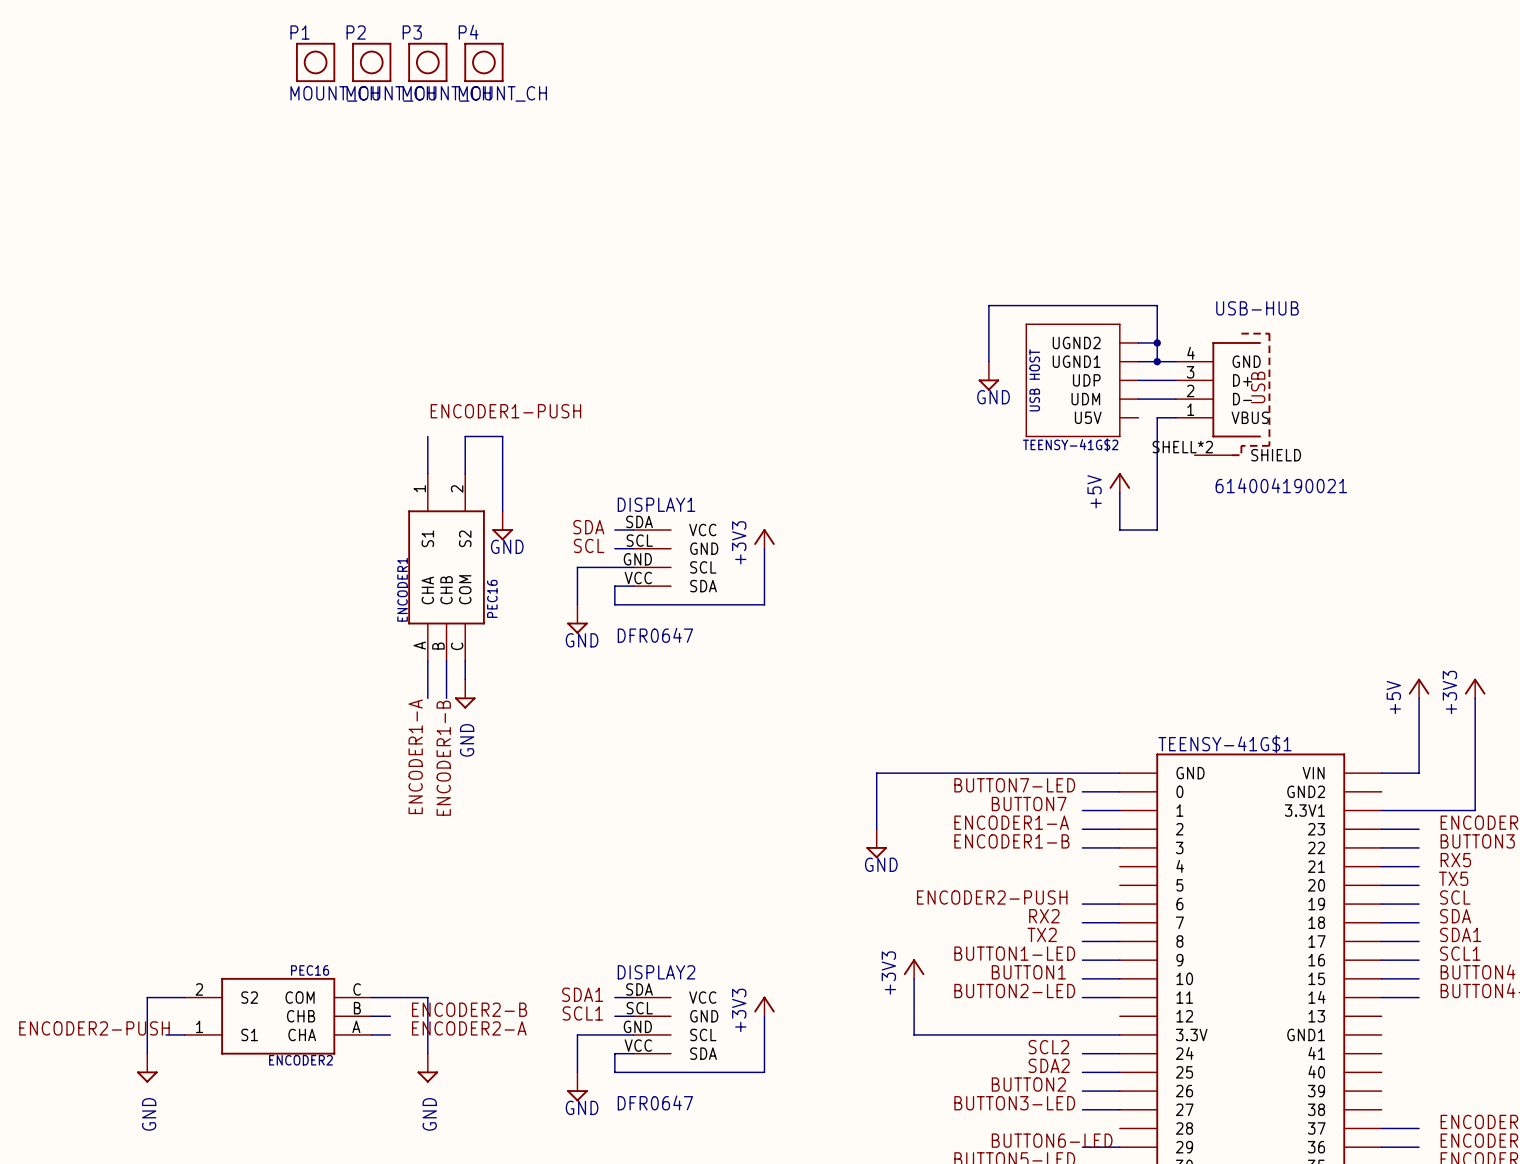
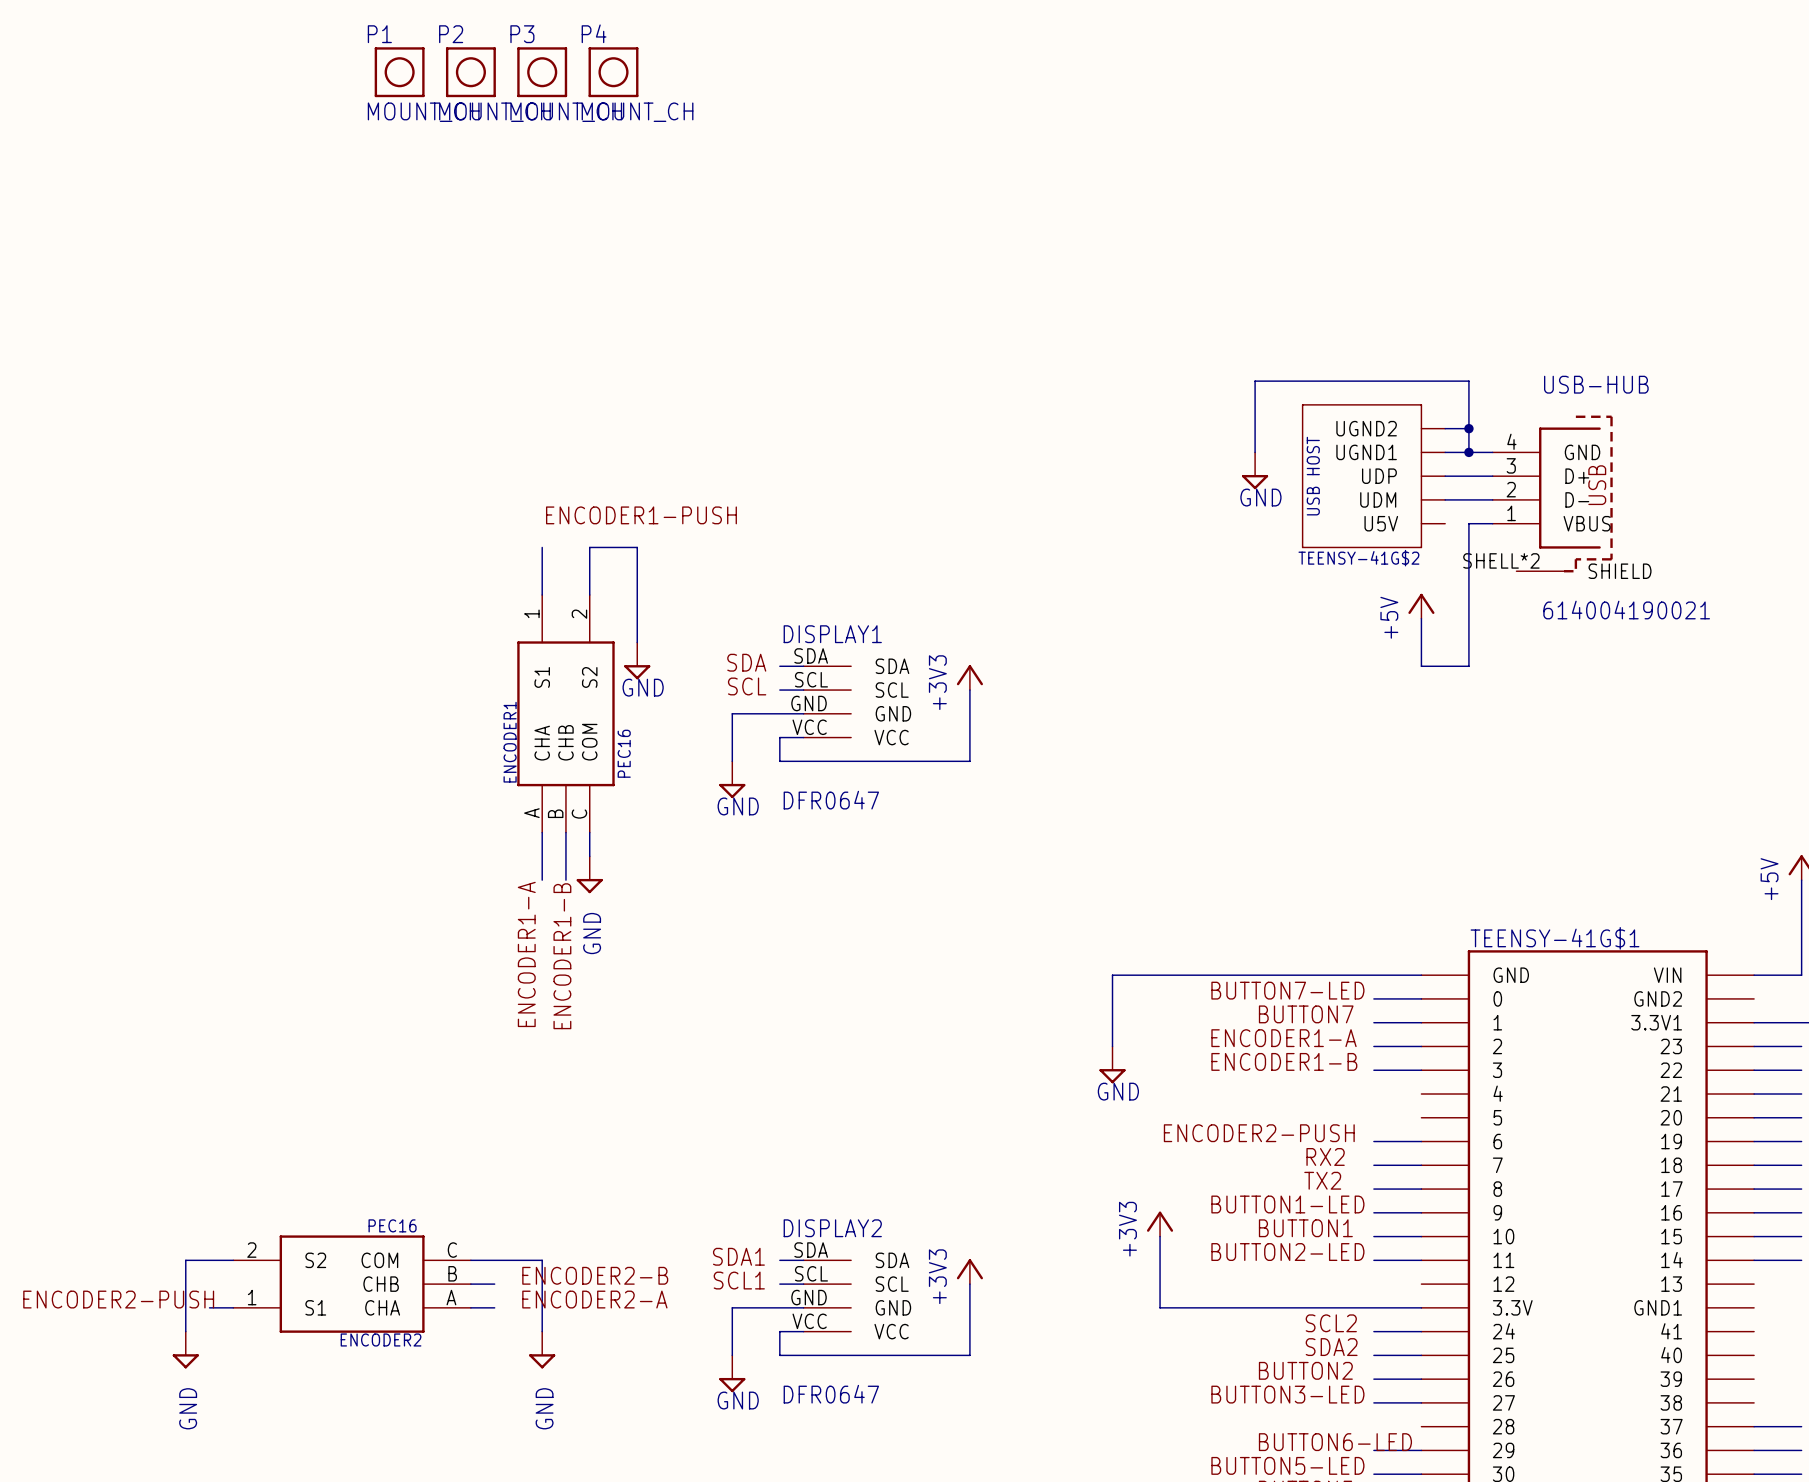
DISPLAY1 pin name: VCC (702, 530) -> SDA (892, 666)
DISPLAY1 pin name: GND (704, 548) -> SCL (892, 690)
DISPLAY1 pin name: SCL (703, 567) -> GND (893, 713)
DISPLAY1 pin name: SDA (703, 586) -> VCC (891, 737)
DISPLAY2 pin name: VCC (702, 997) -> SDA (892, 1260)
DISPLAY2 pin name: GND (704, 1016) -> SCL (892, 1284)
DISPLAY2 pin name: SCL (703, 1034) -> GND (893, 1307)
DISPLAY2 pin name: SDA (703, 1053) -> VCC (891, 1331)

